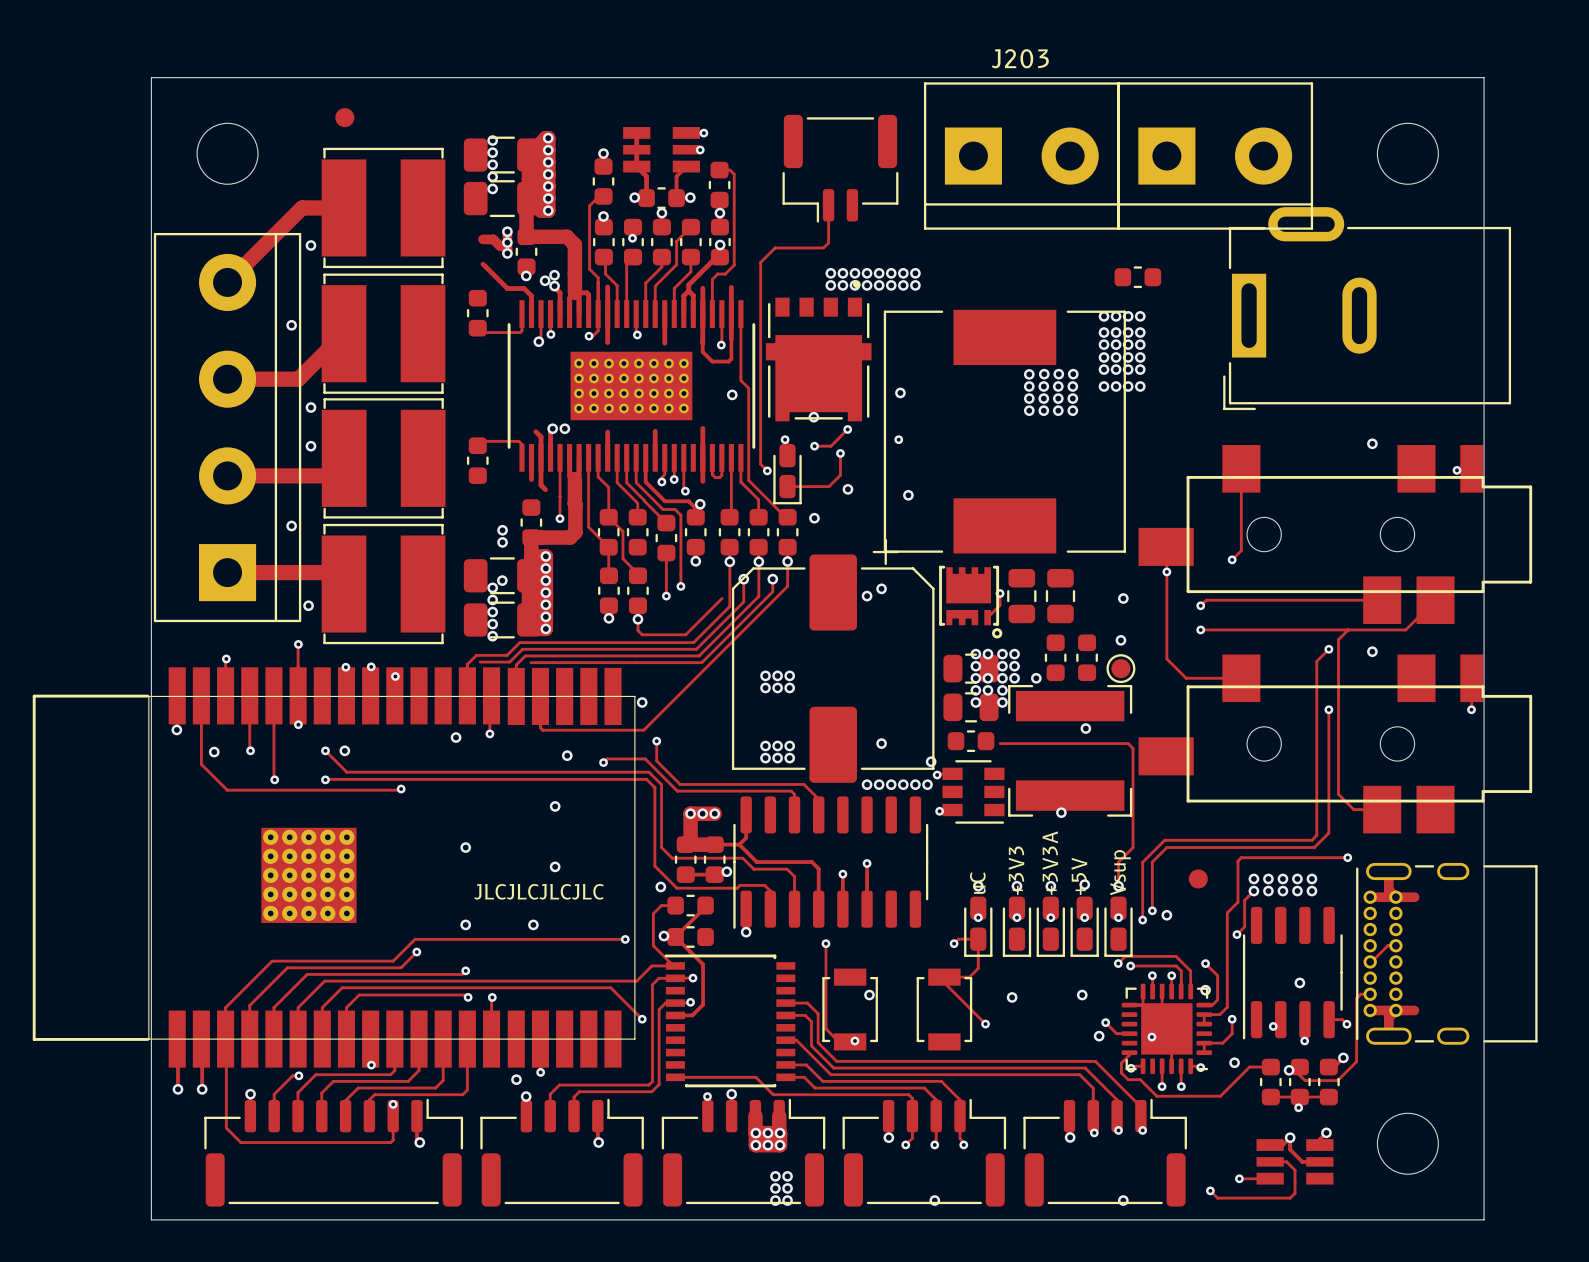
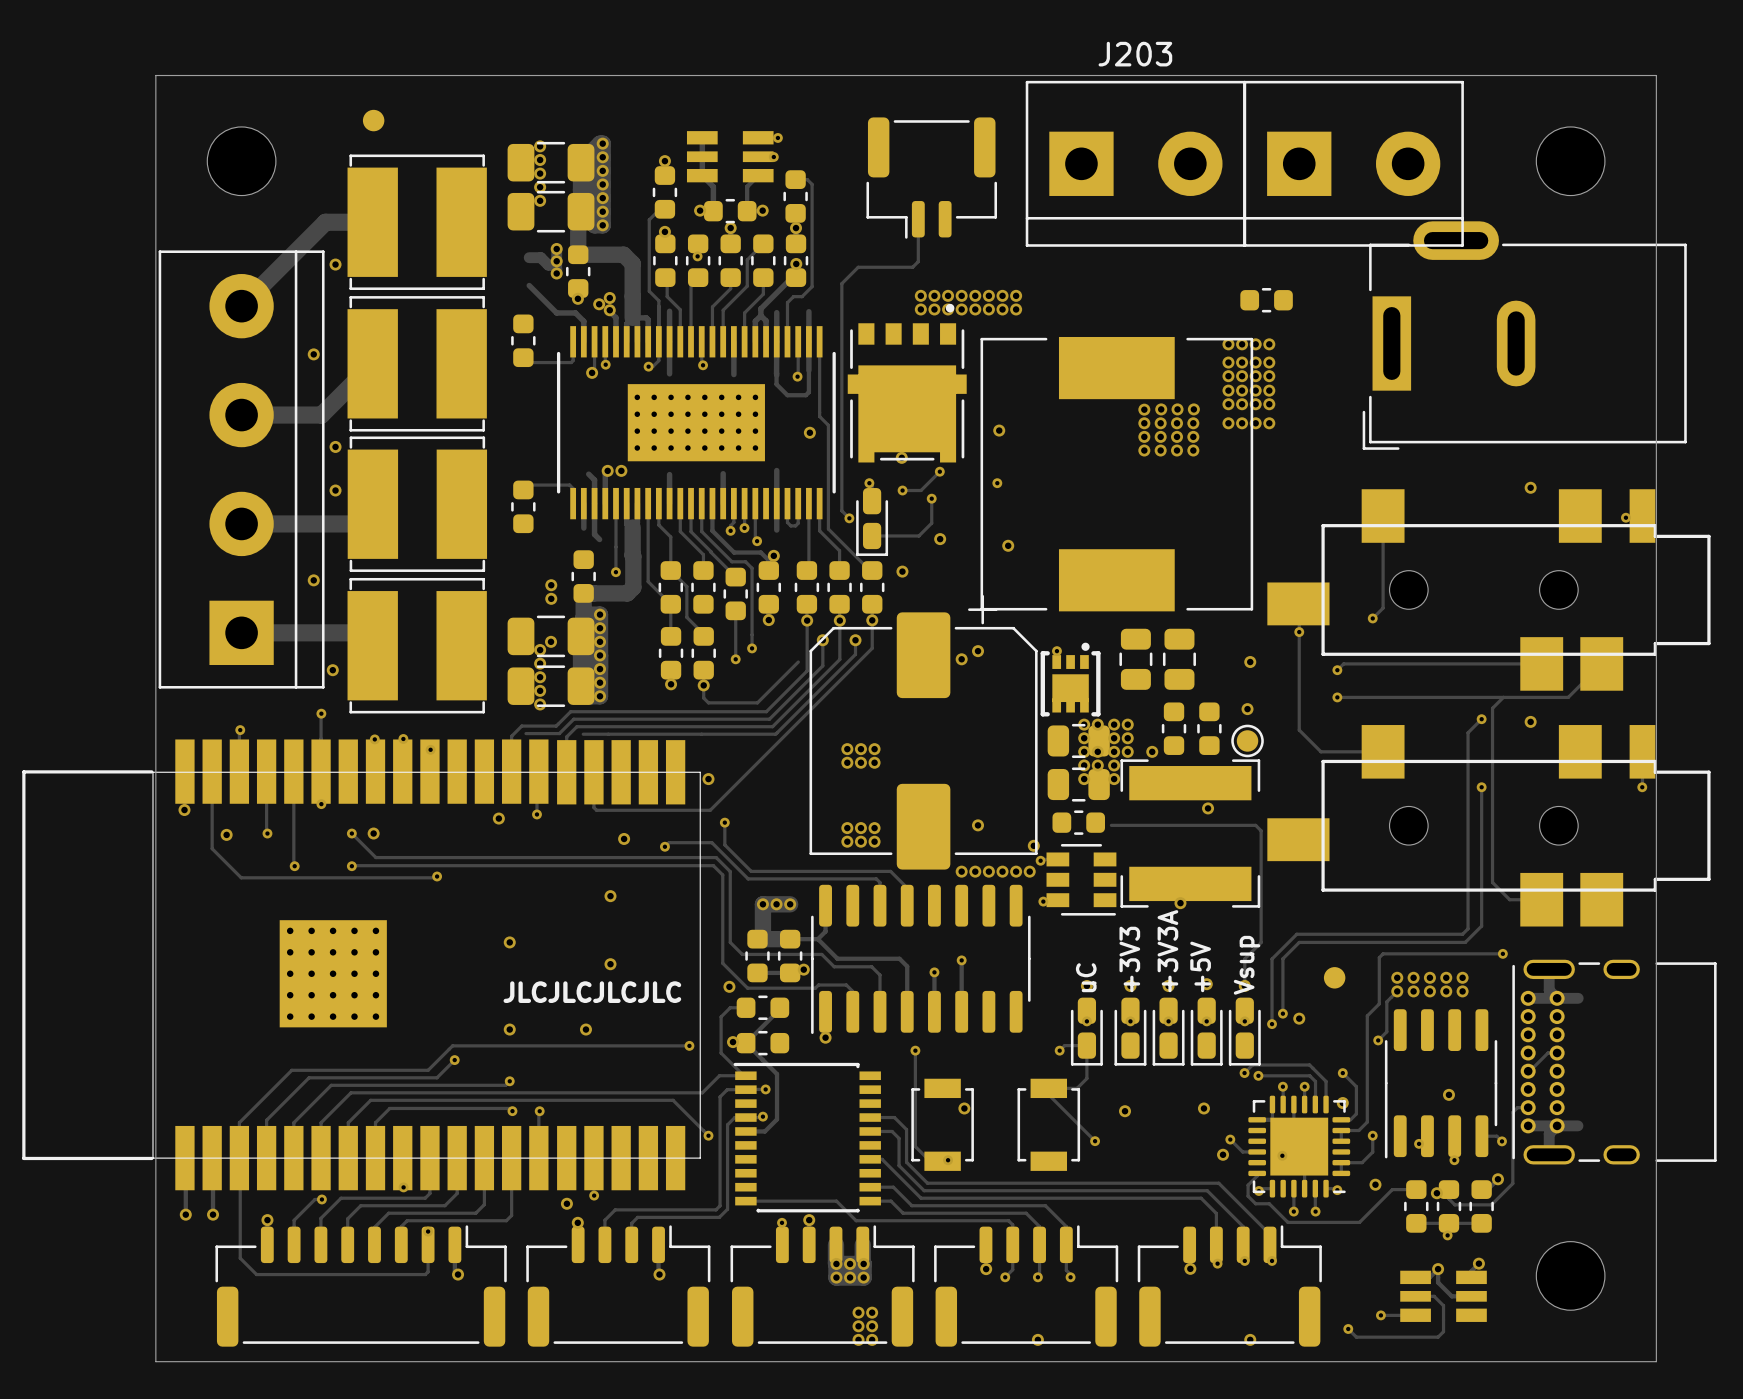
part footprint: [939, 565, 1003, 639] -> [1040, 642, 1101, 717]
track: (1000, 593) (1000, 605) (987, 617) -> none
via position: (1000, 593) -> (1056, 651)

